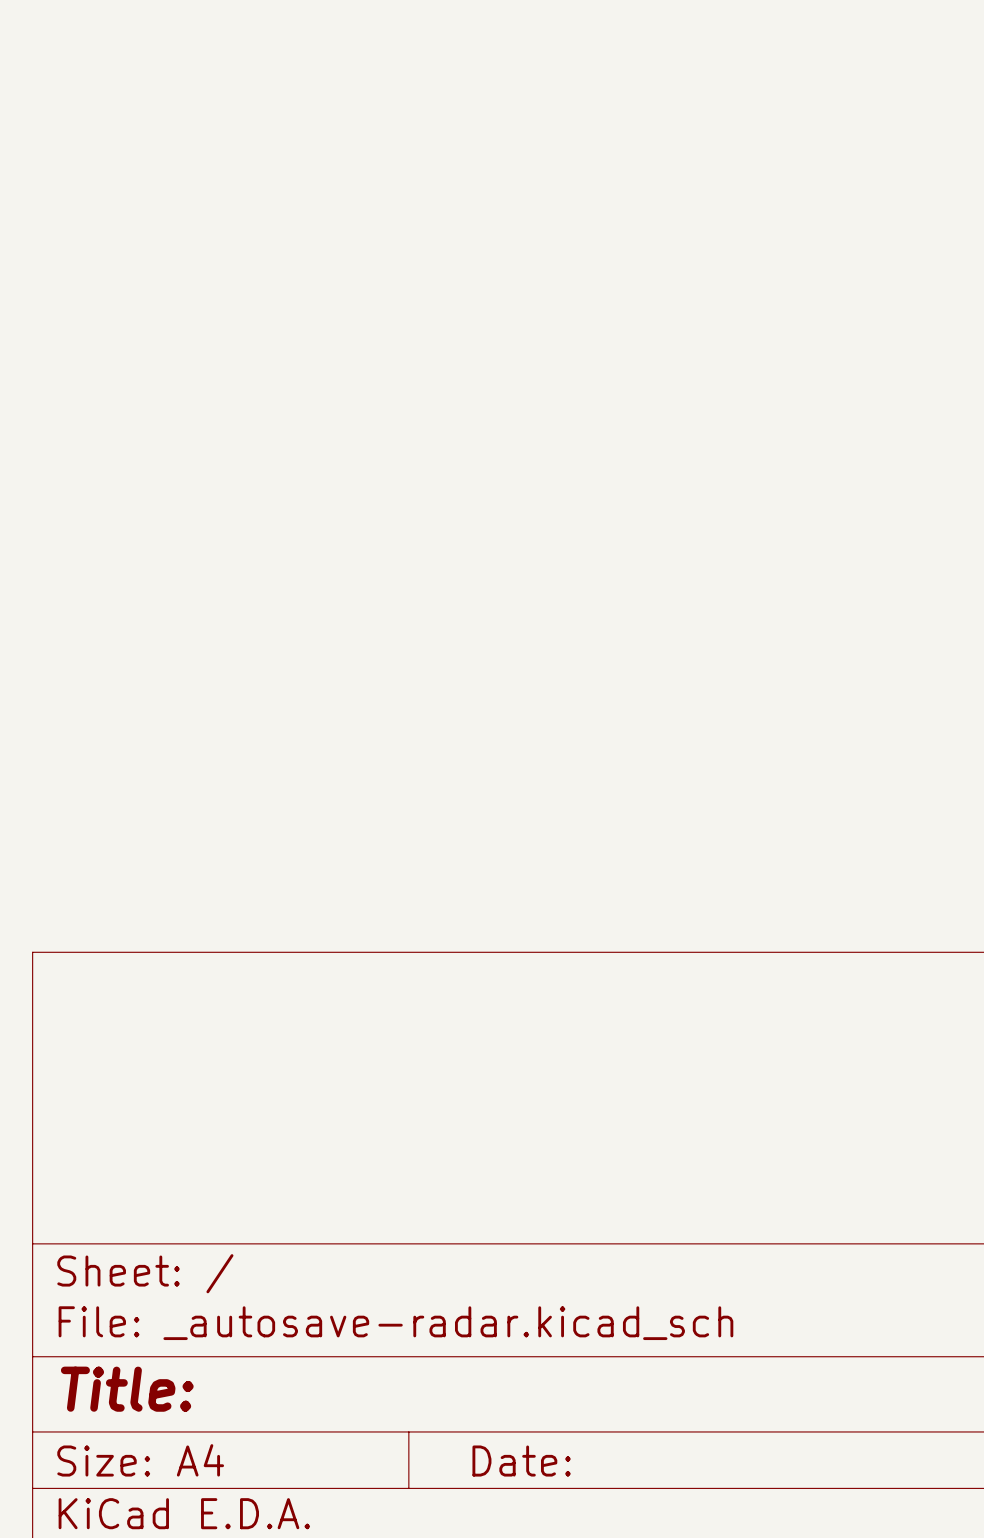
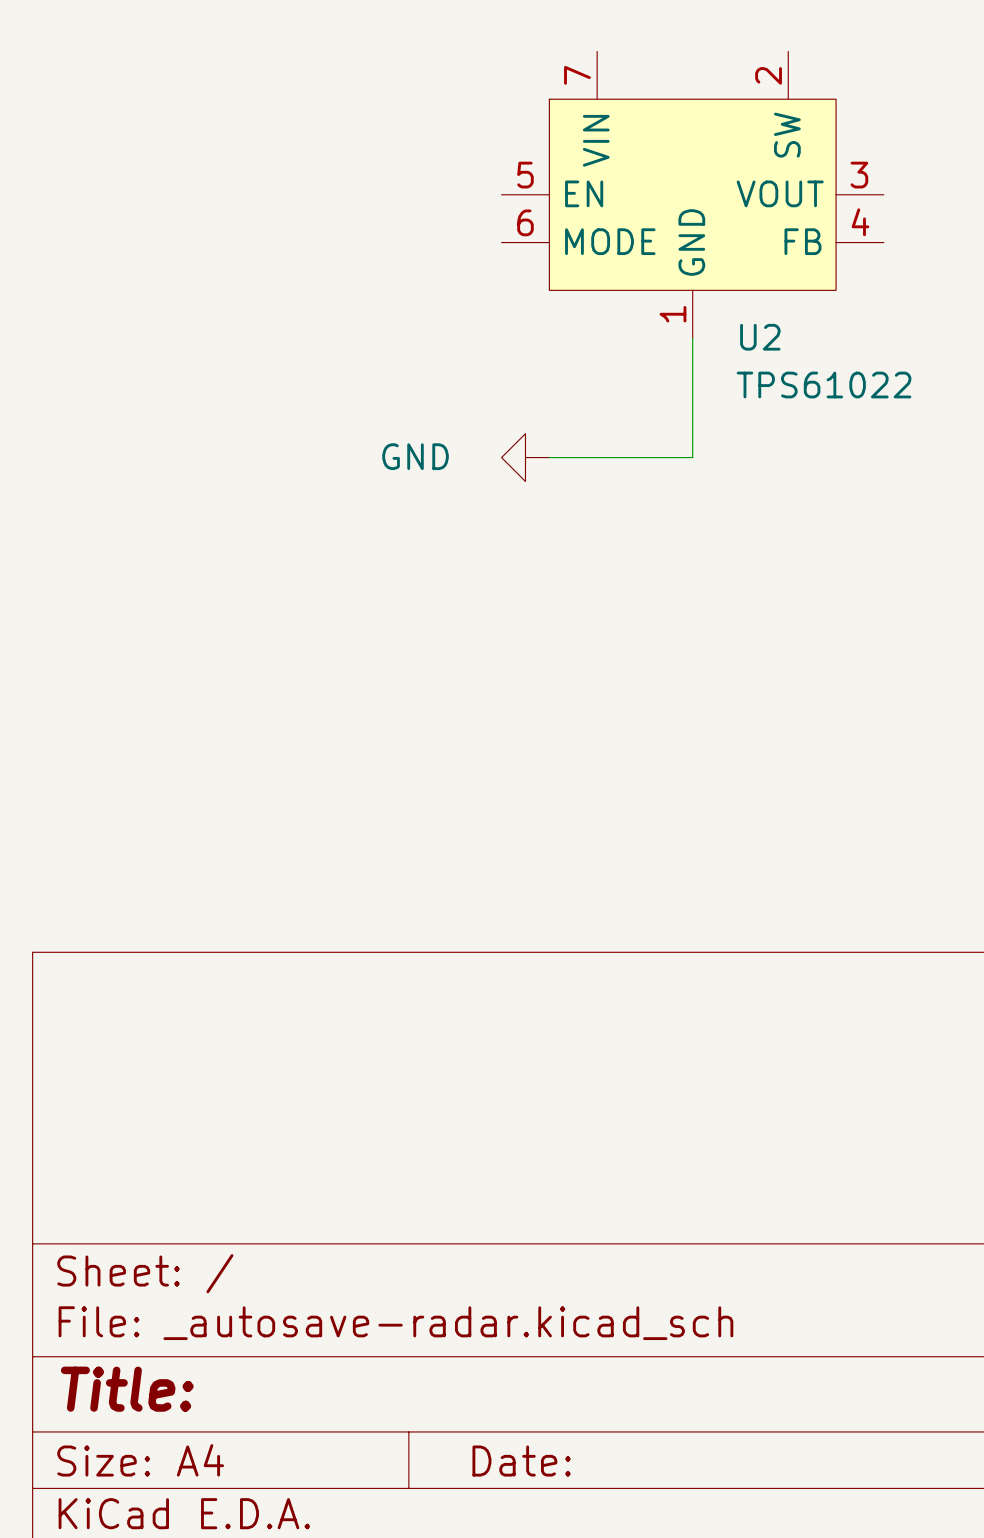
U2: none -> TPS61022 (692, 194)
wire: none -> (692, 338) (692, 457) (549, 457)
power symbol: none -> GND (525, 457)

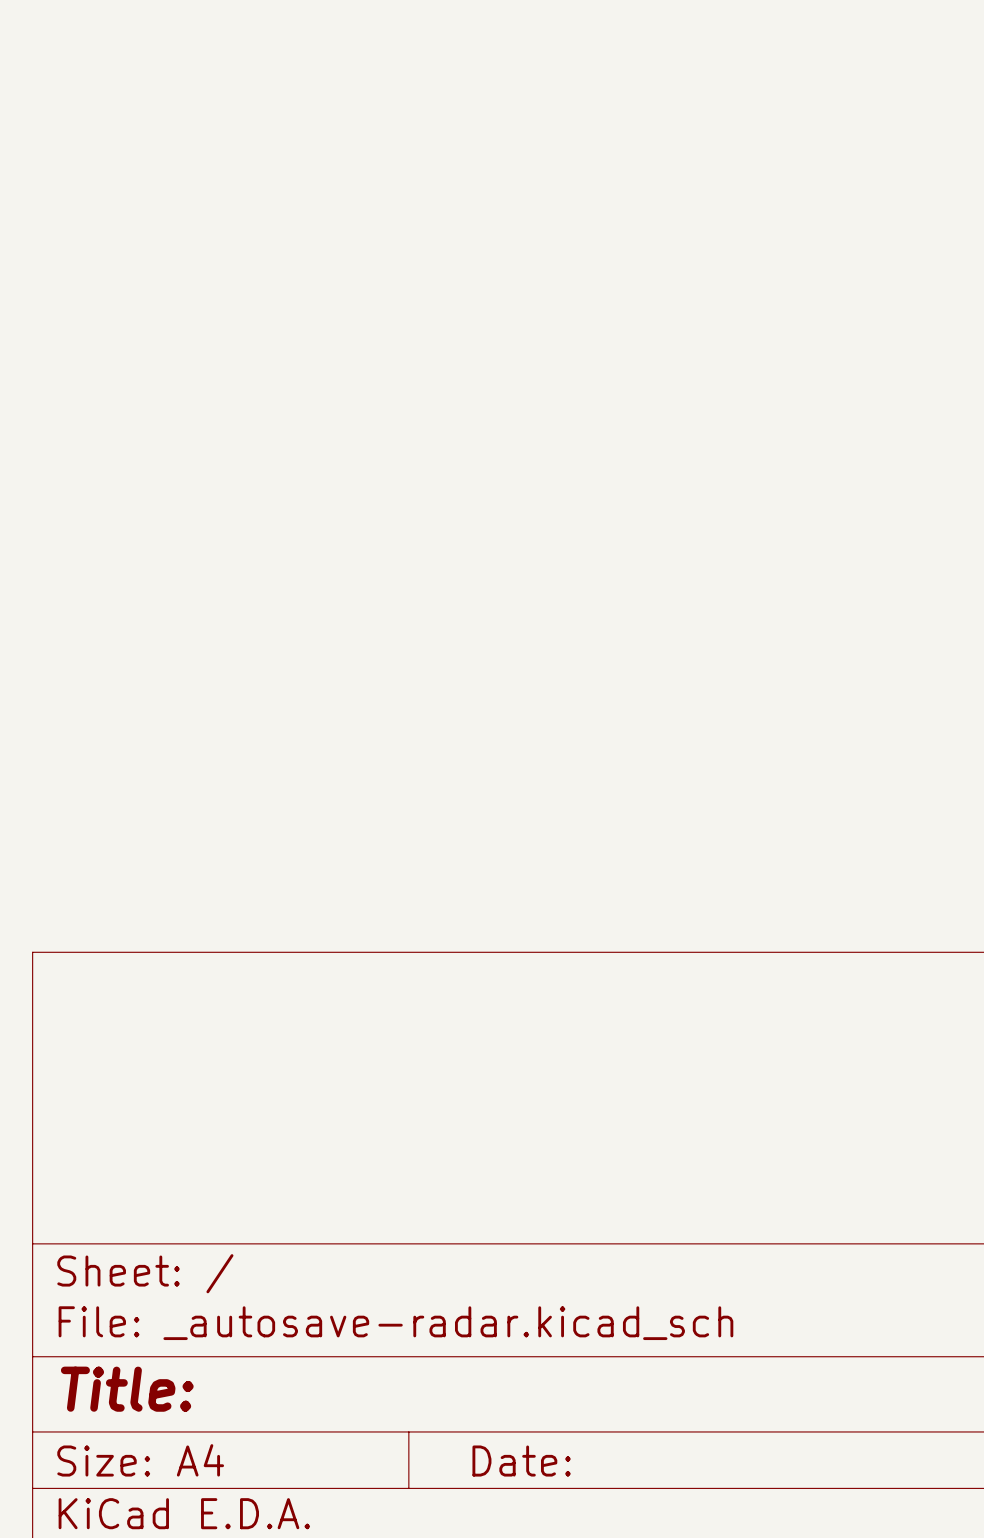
U2: TPS61022 (692, 194) -> none
wire: (692, 338) (692, 457) (549, 457) -> none
power symbol: GND (525, 457) -> none

